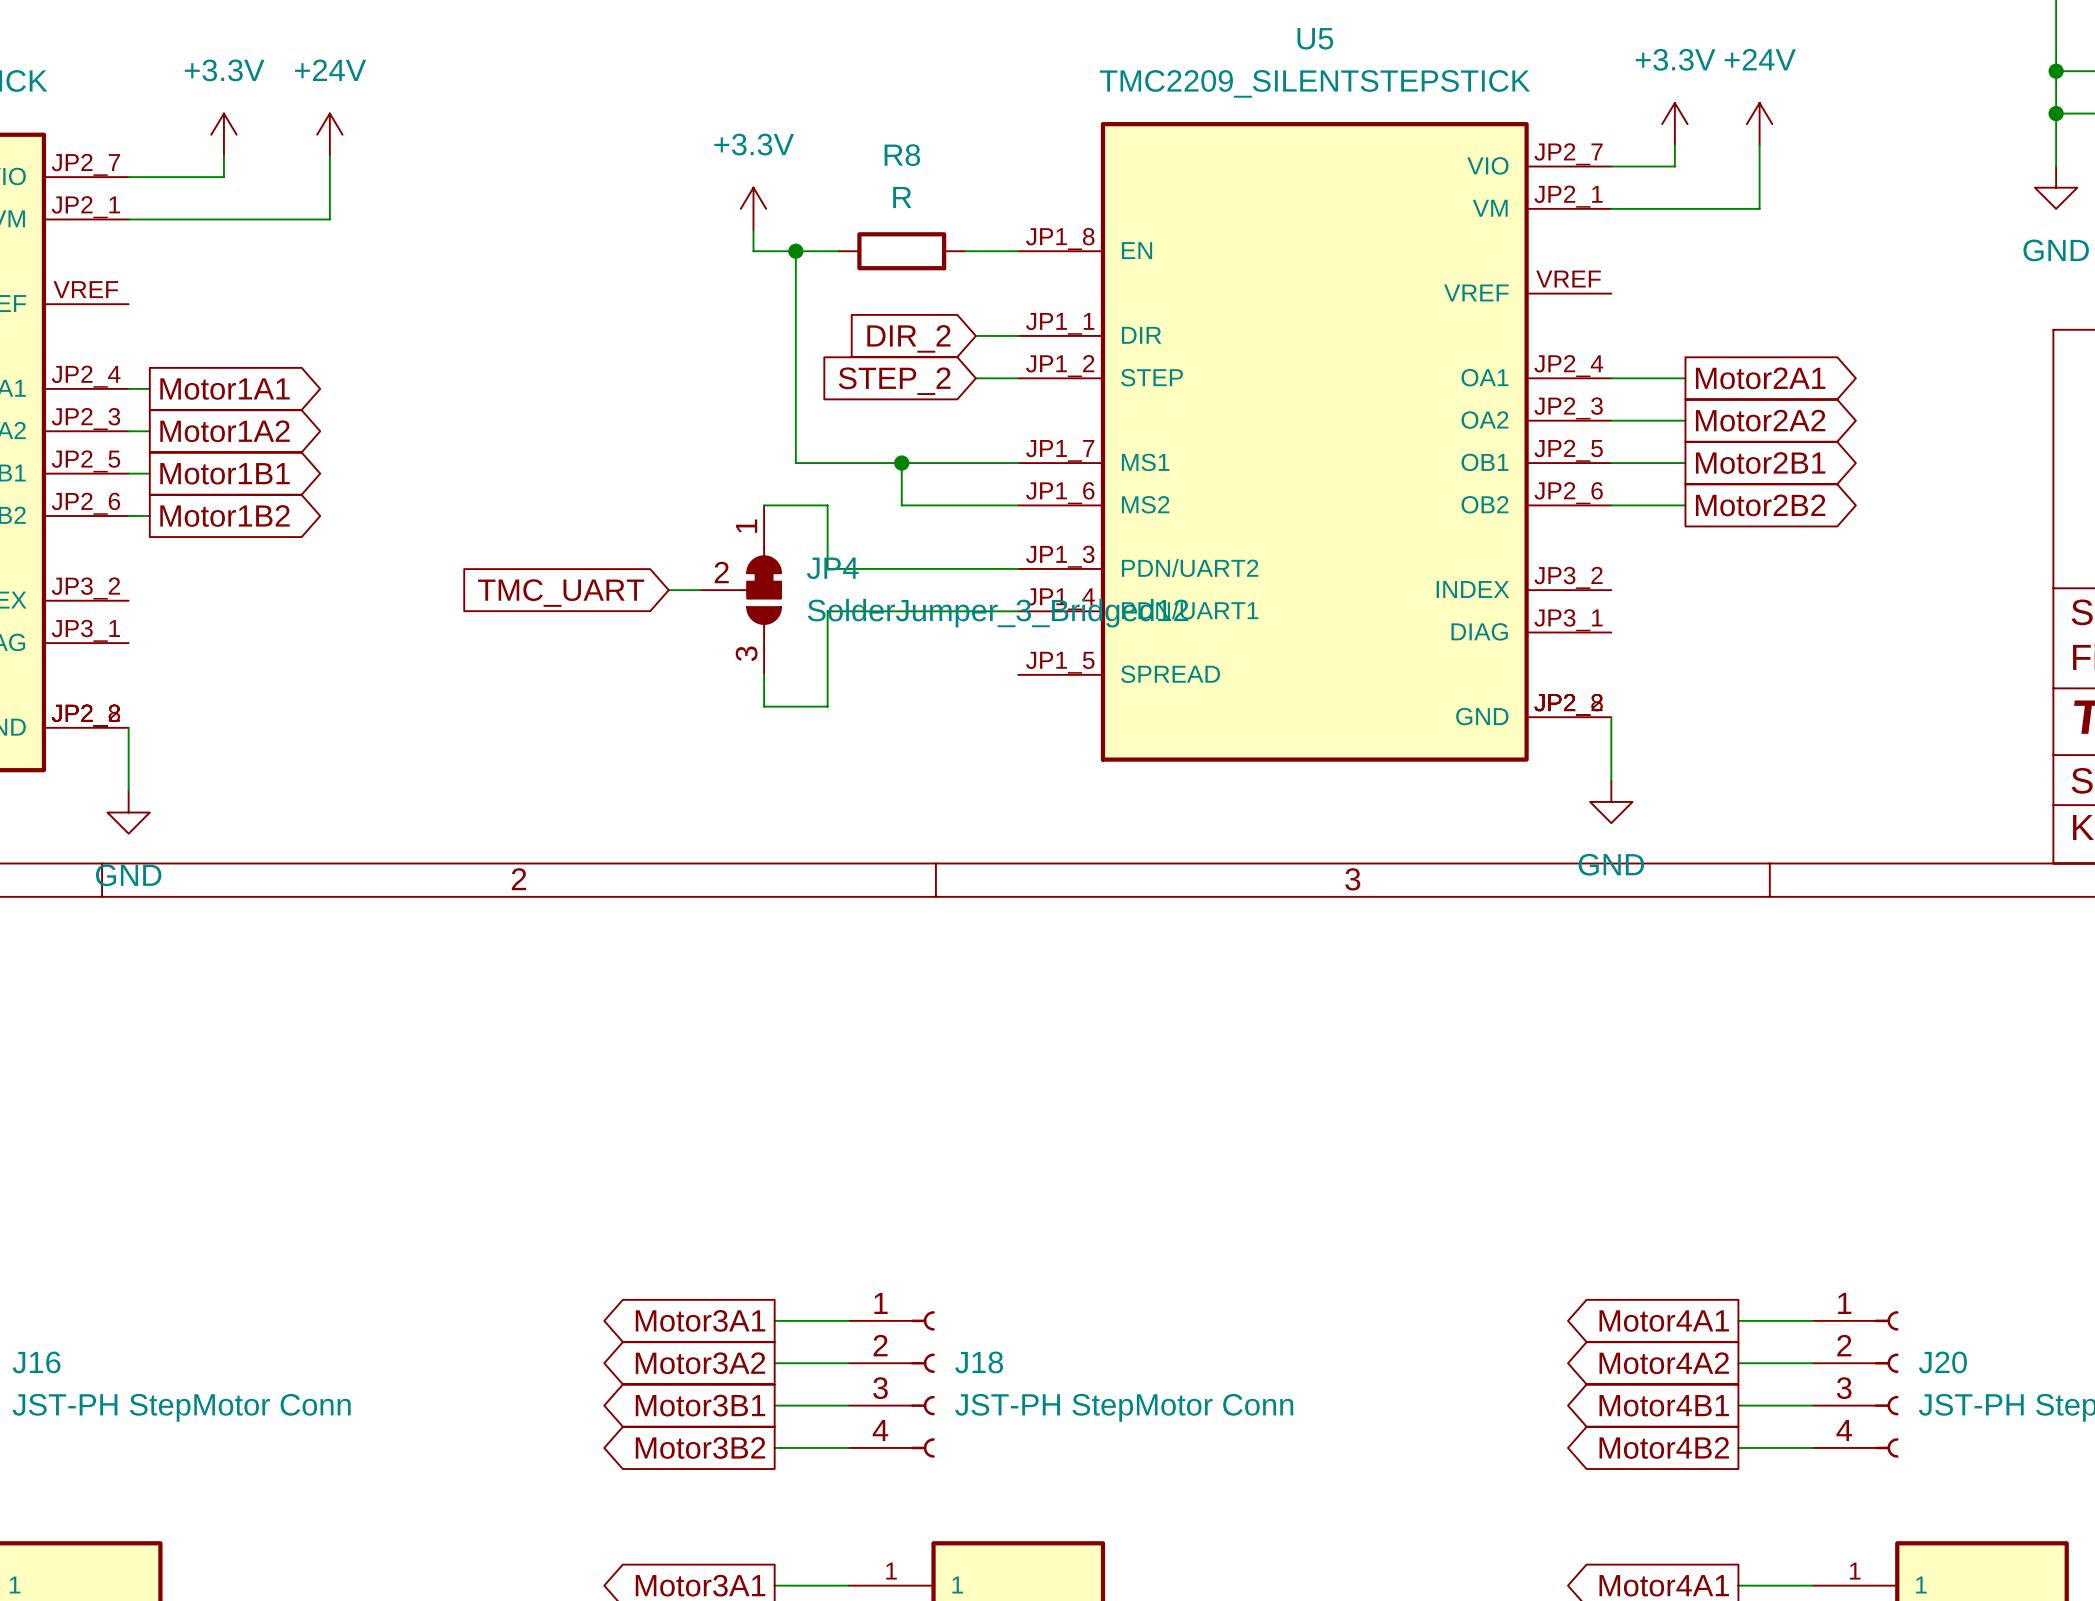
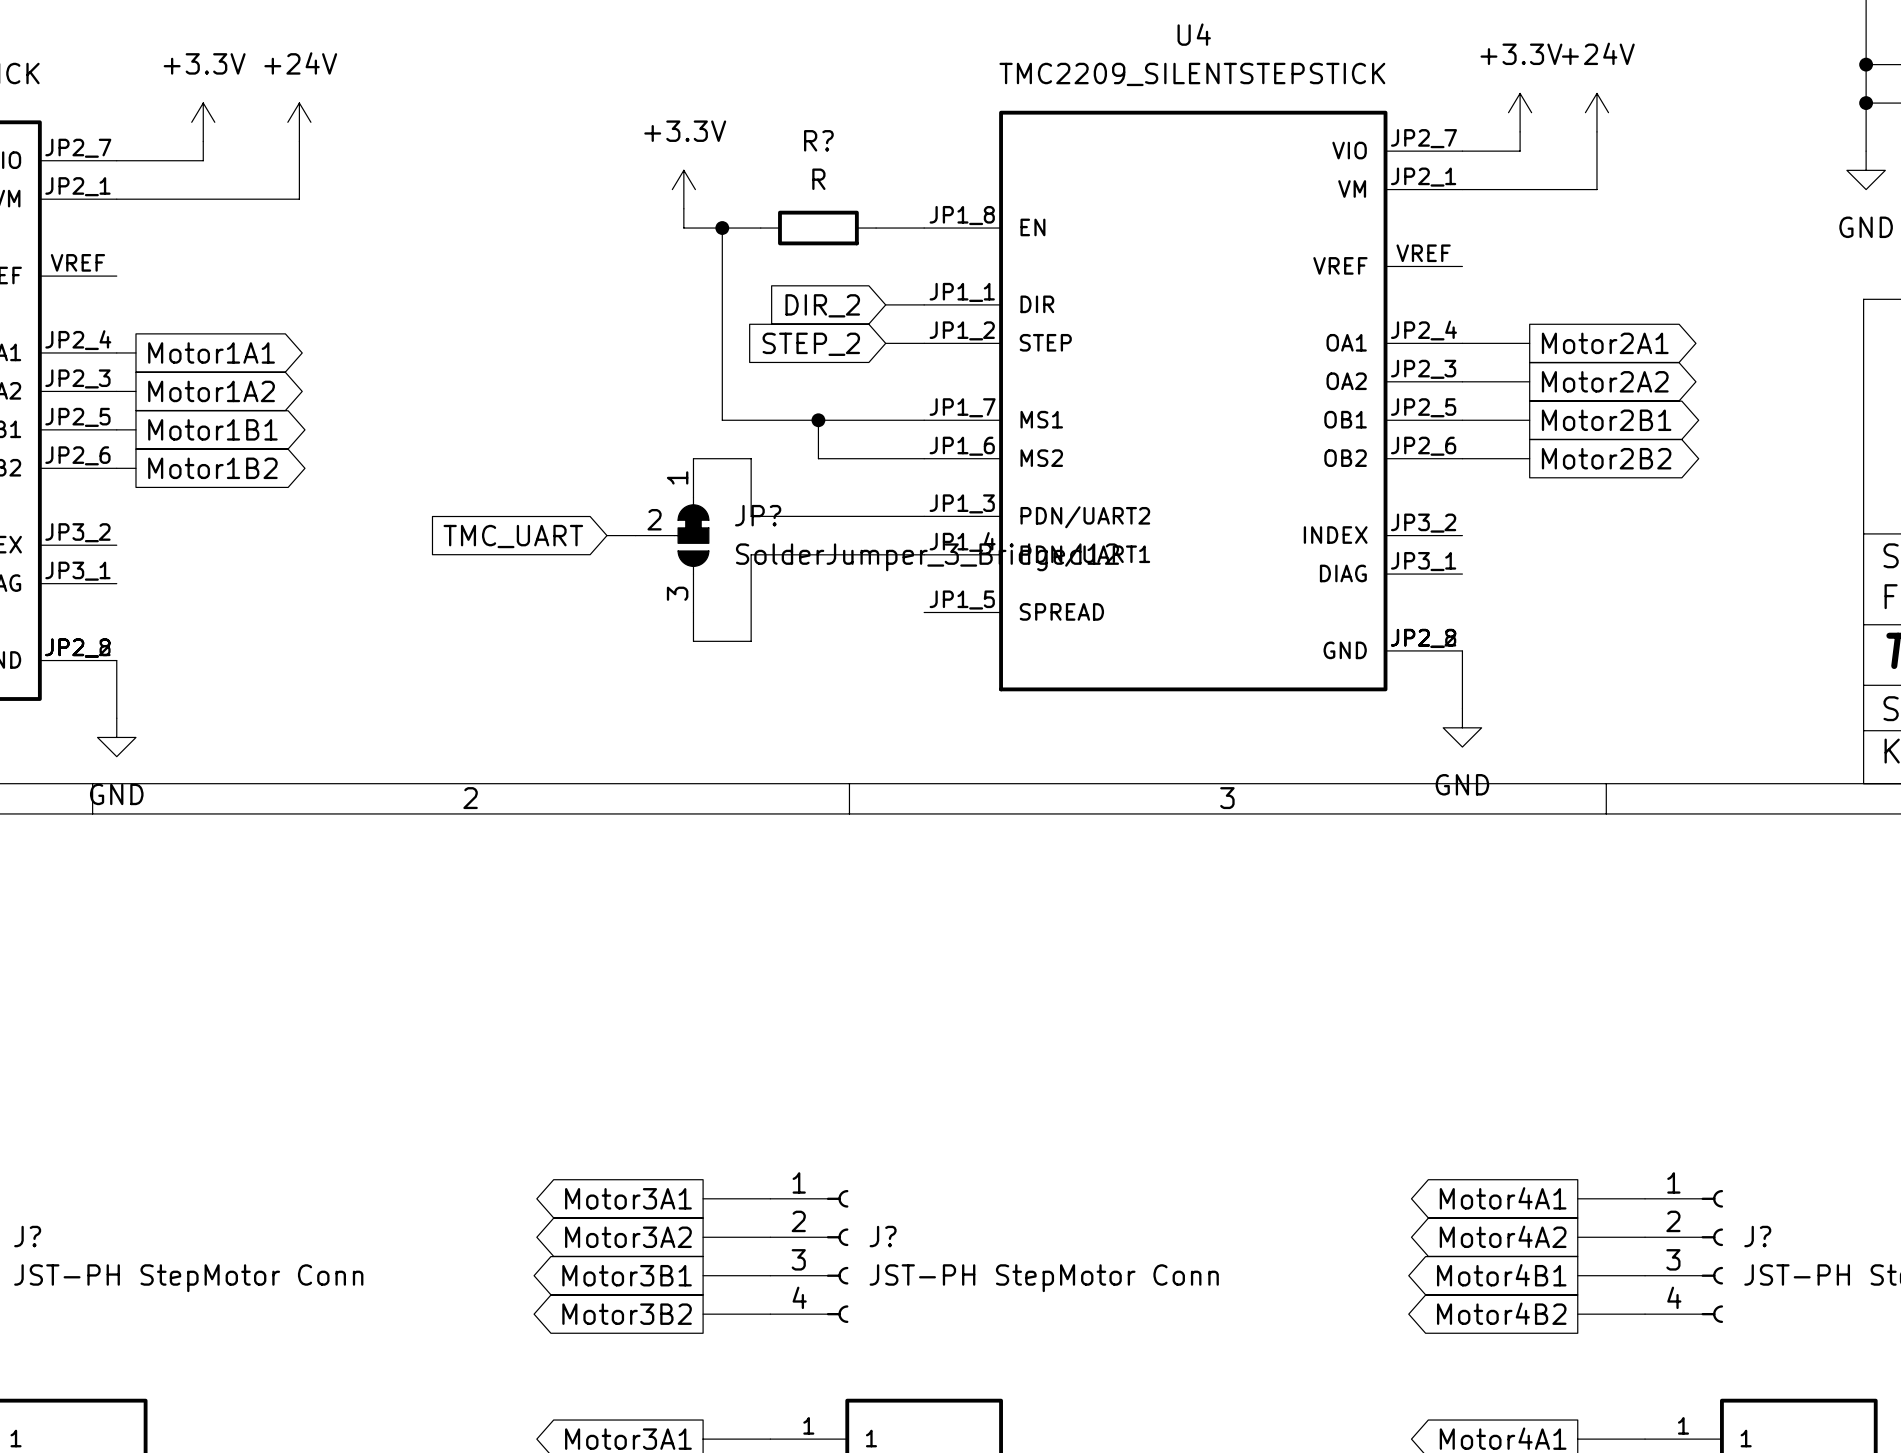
U5 name: U5 (1315, 38) -> U4 (1194, 34)
R8 name: R8 (902, 155) -> R? (818, 140)
JP4 name: JP4 (832, 568) -> JP? (758, 515)
J16 name: J16 (36, 1362) -> J? (27, 1236)
J18 name: J18 (979, 1362) -> J? (883, 1236)
J20 name: J20 (1942, 1362) -> J? (1757, 1236)

